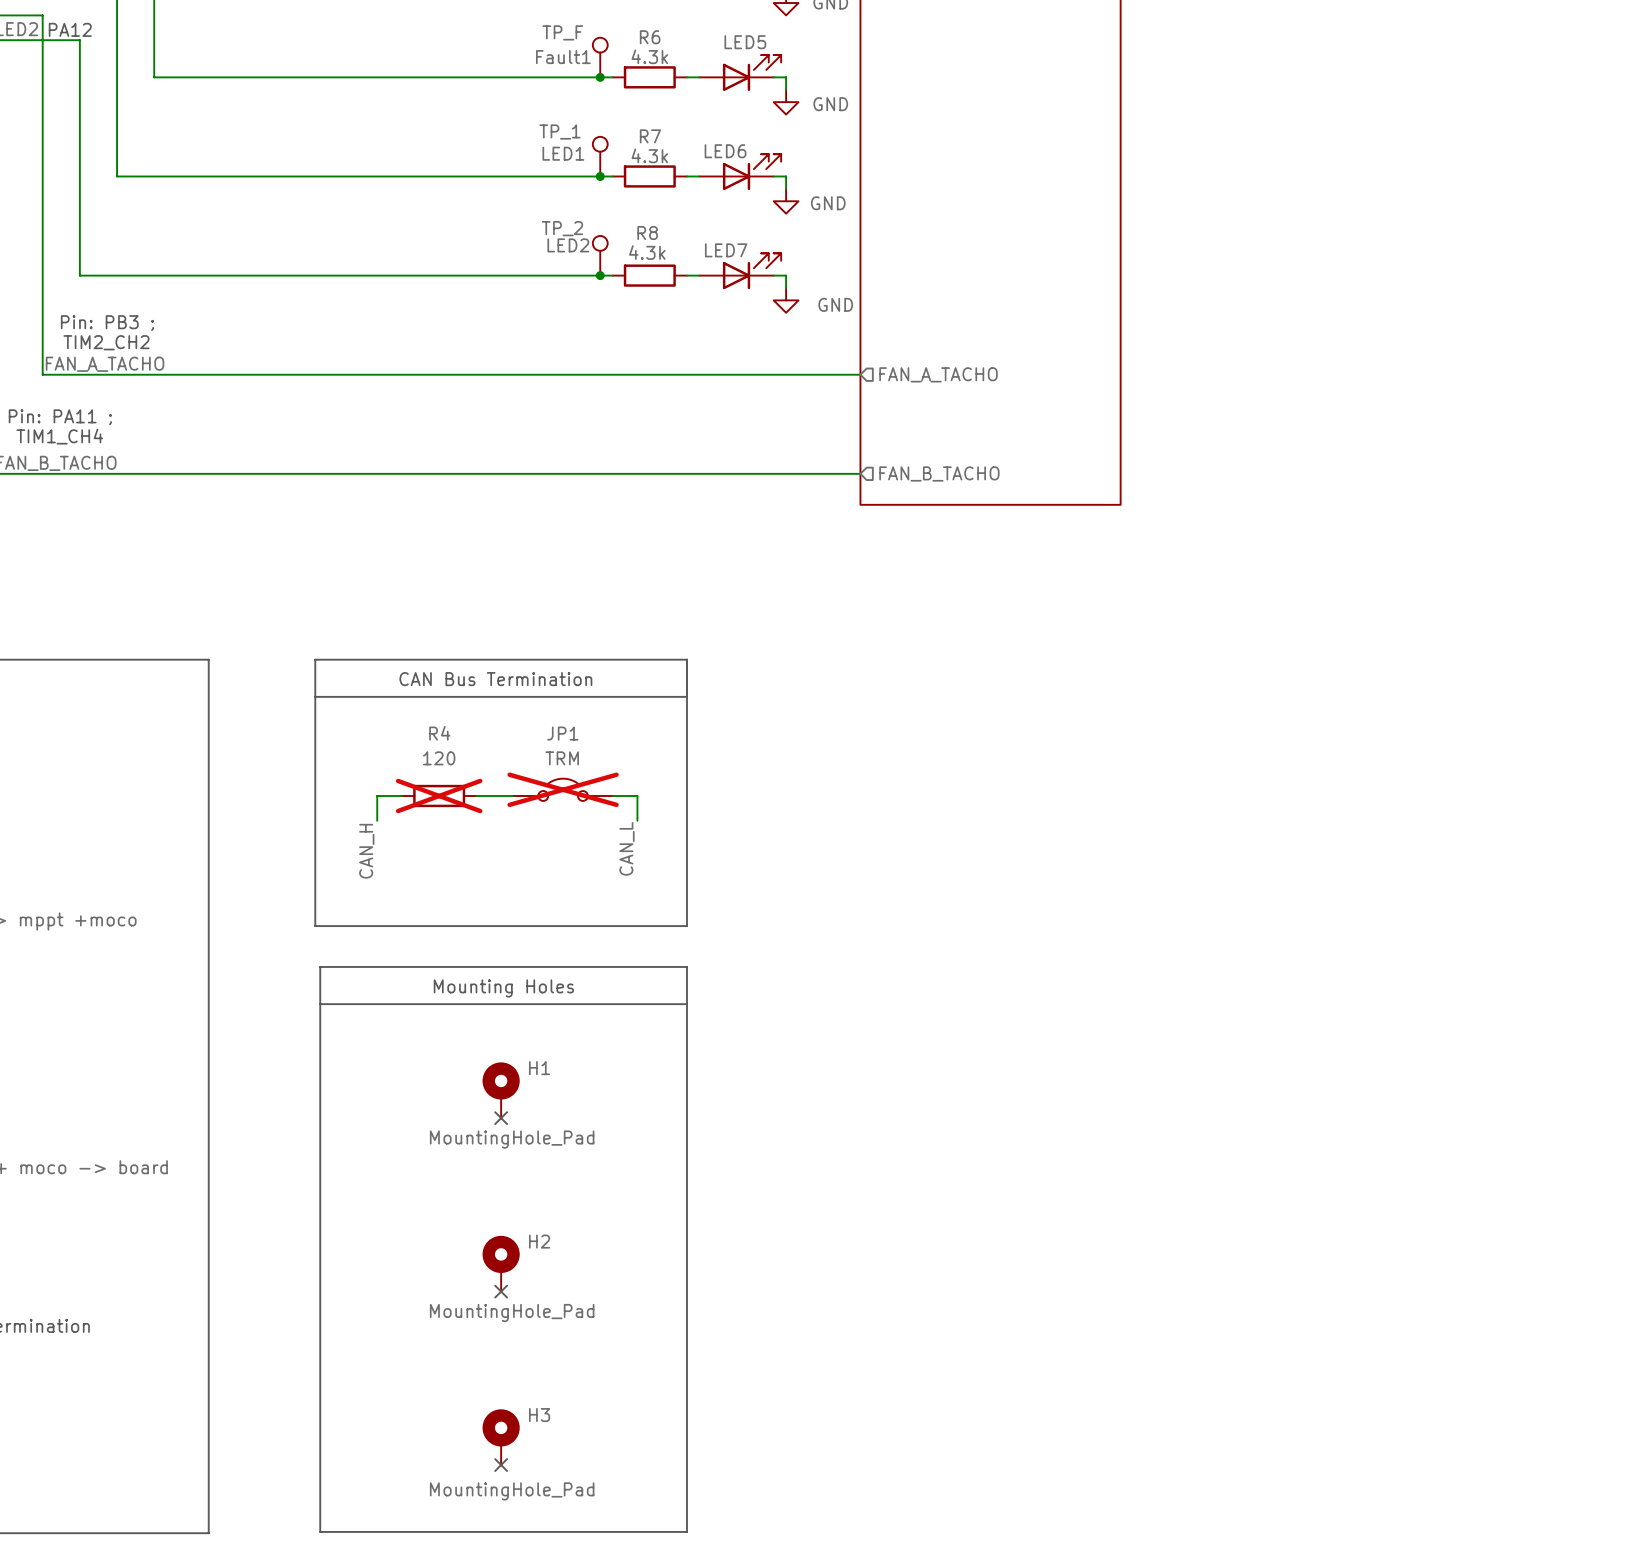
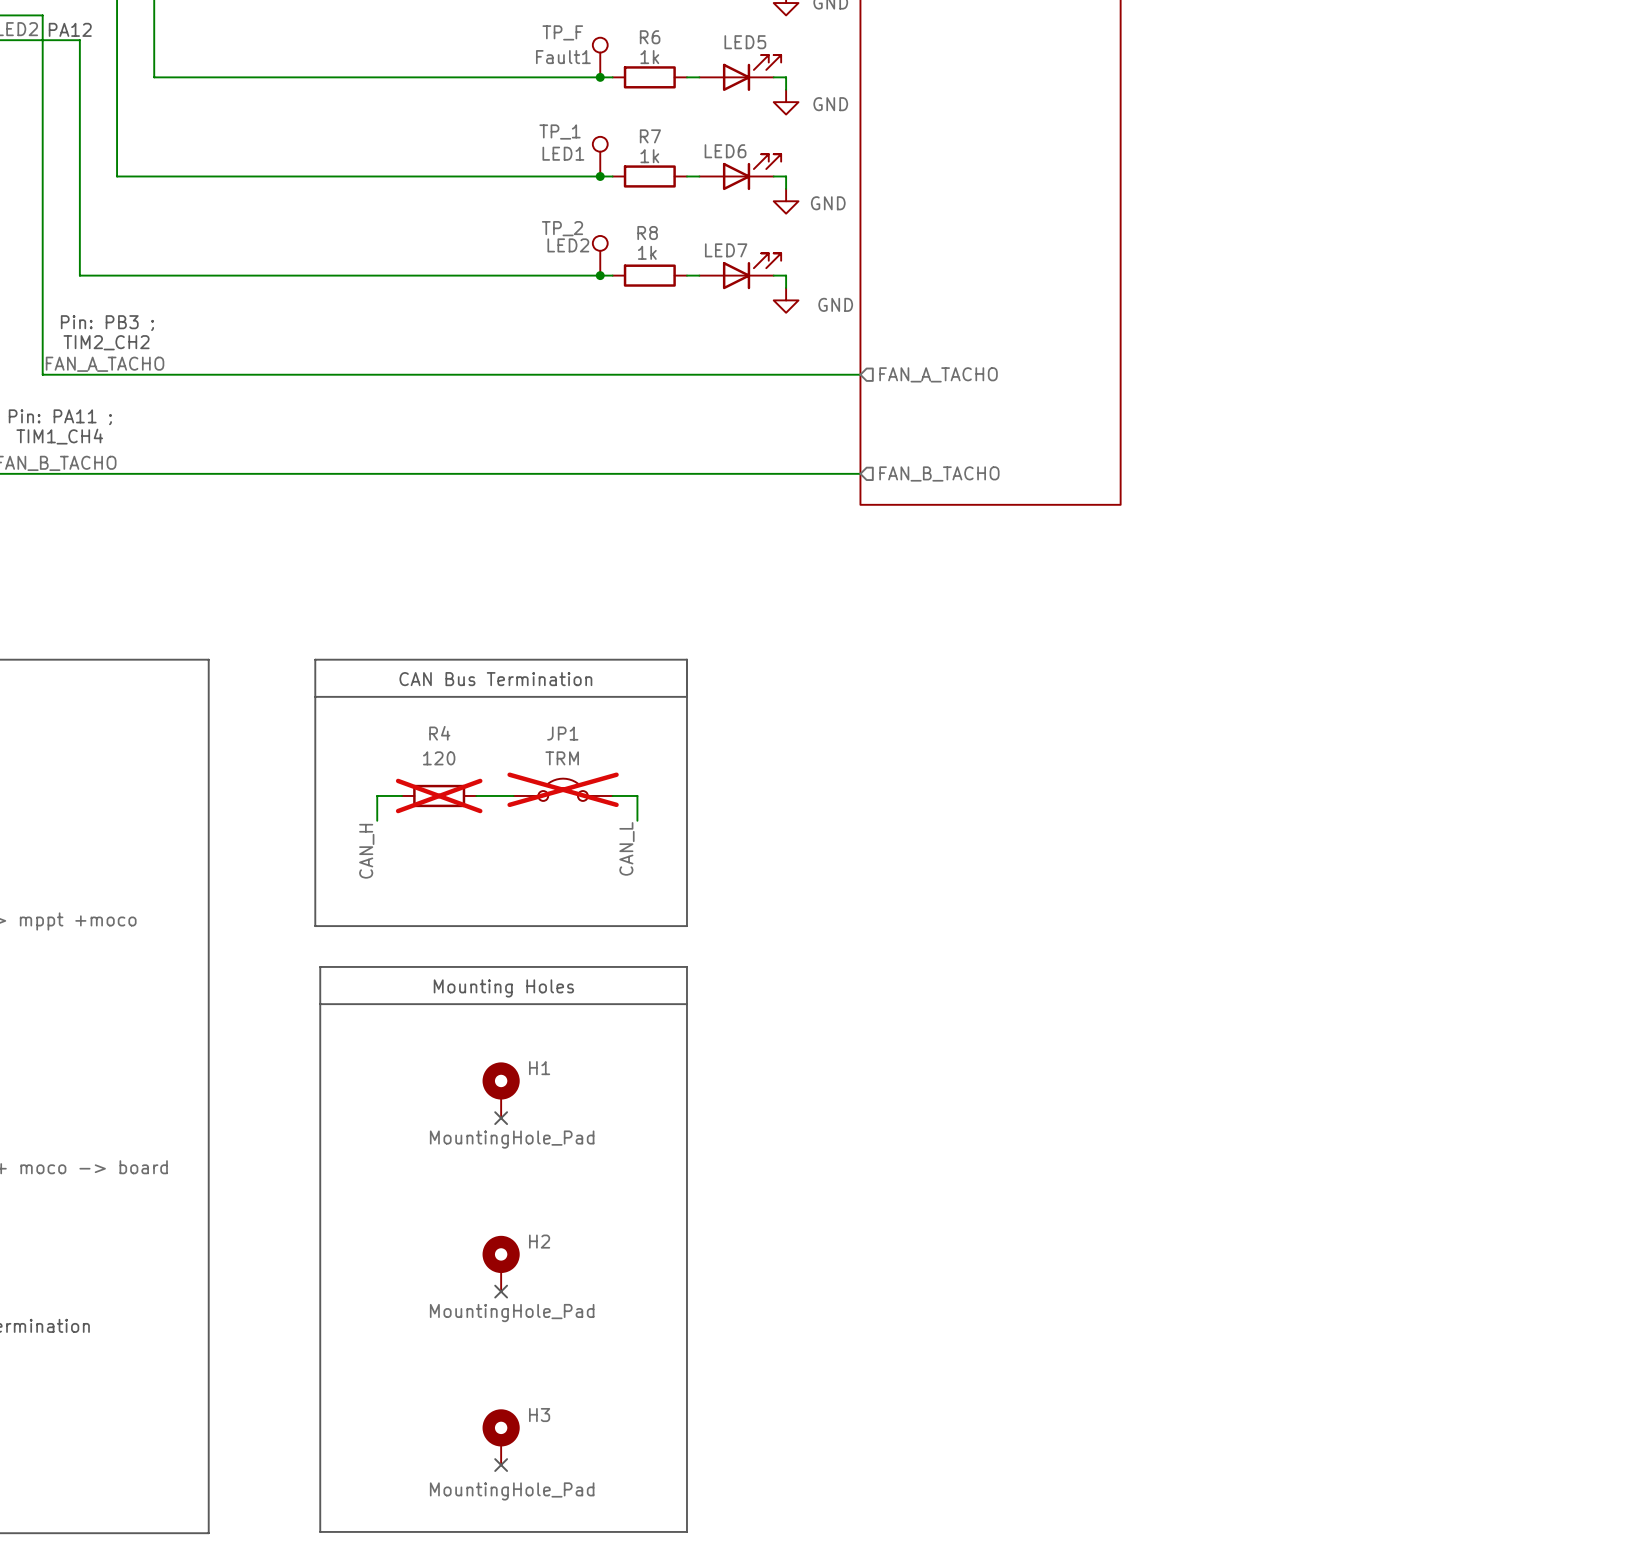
R6 value: 4.3k (649, 56) -> 1k (649, 57)
R7 value: 4.3k (649, 155) -> 1k (649, 156)
R8 value: 4.3k (647, 252) -> 1k (647, 252)

